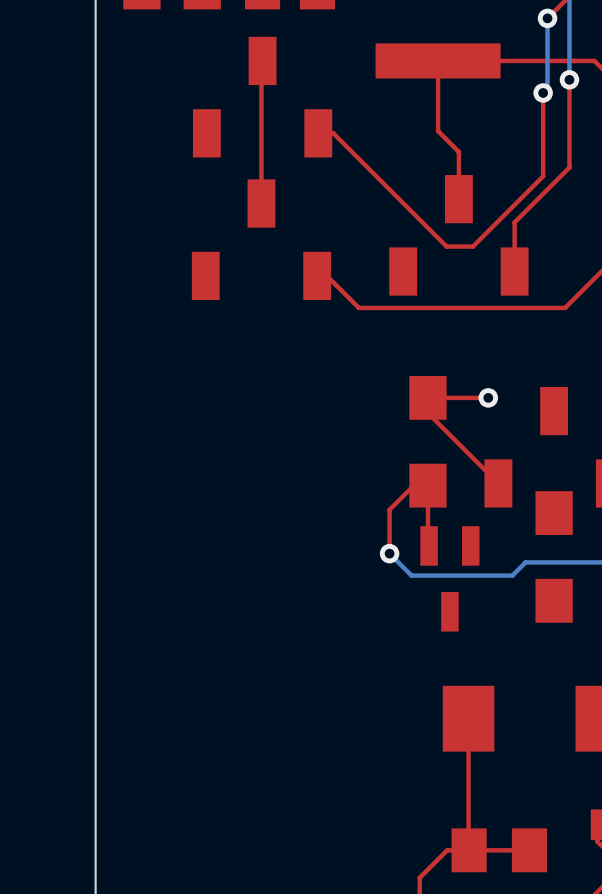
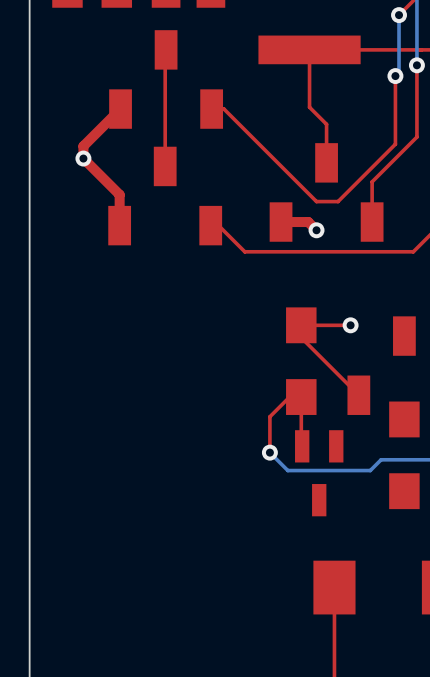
top track: none -> (120, 109) (83, 146) (83, 158) (119, 194) (119, 225)
via: none -> (83, 158)
top track: none -> (281, 222) (308, 222) (316, 230)
via: none -> (316, 230)

